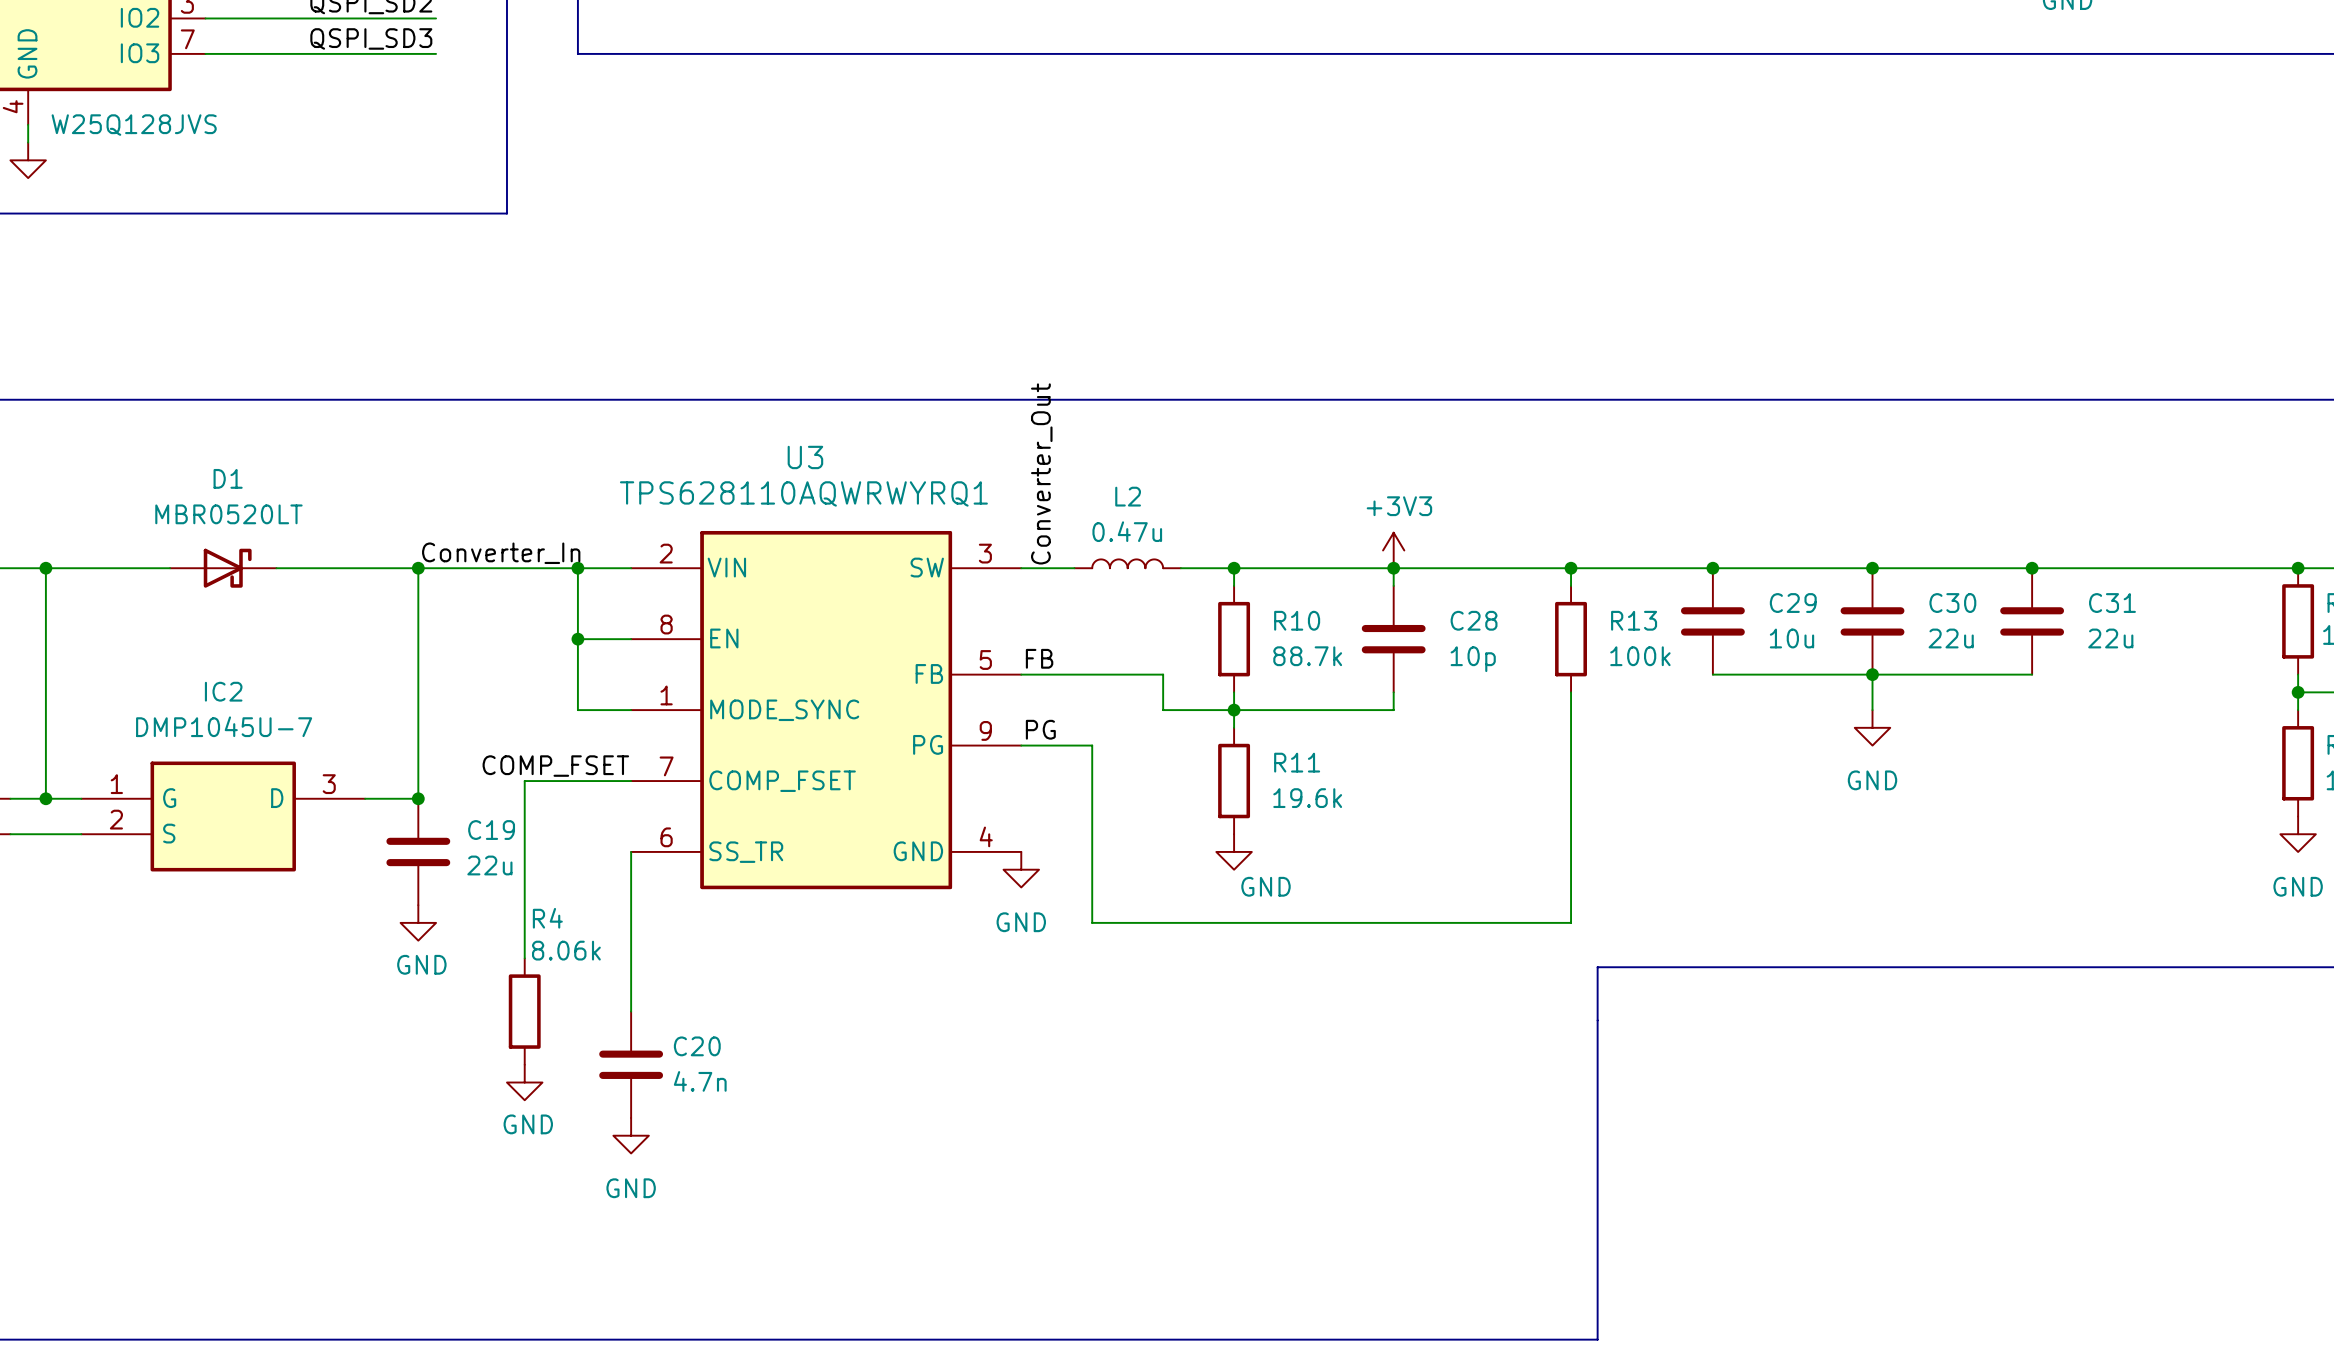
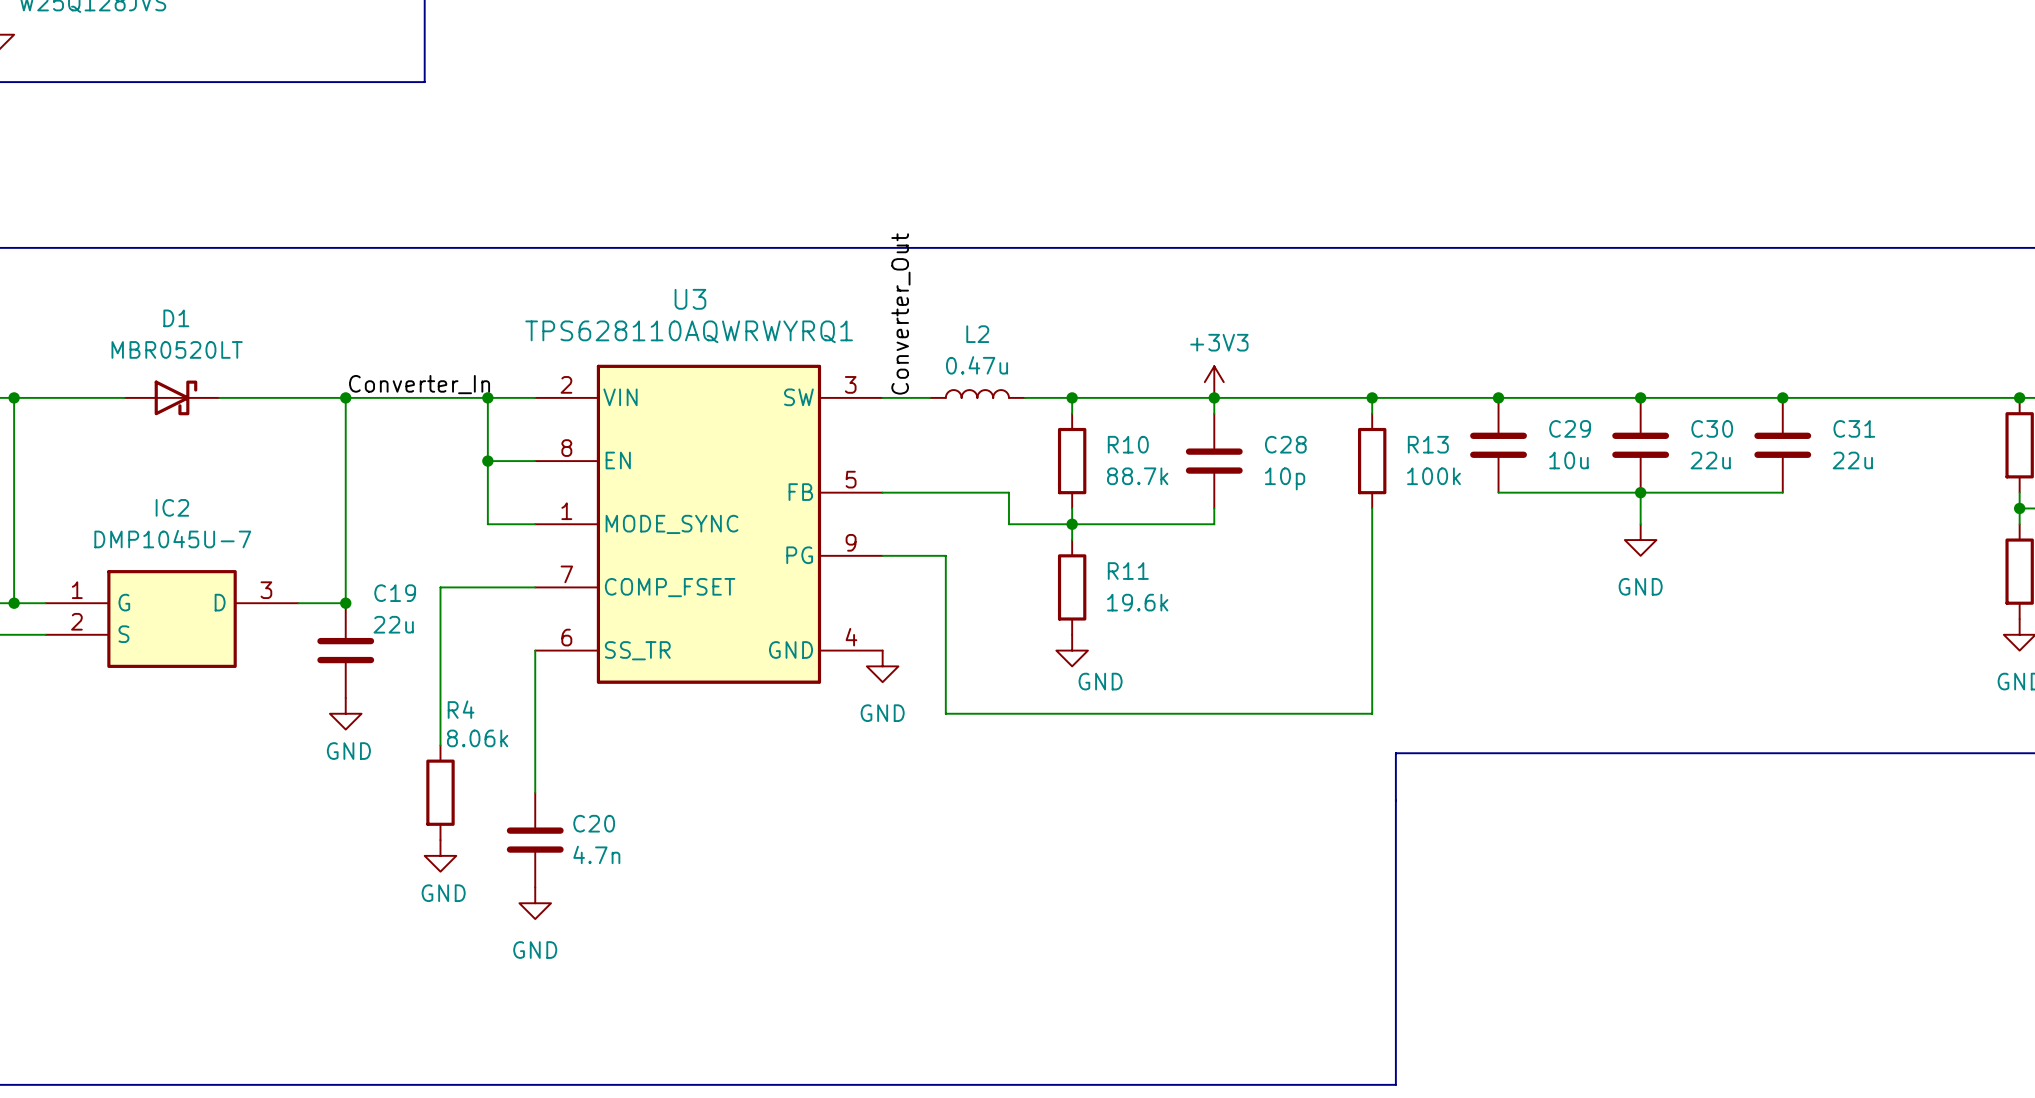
label: FB (1039, 658) -> none
label: PG (1040, 729) -> none
label: COMP_FSET (555, 766) -> none
C19 name position: C19 (491, 830) -> C19 (395, 593)
C19 value position: 22u (489, 865) -> 22u (393, 624)

